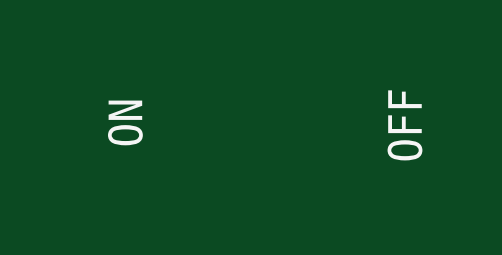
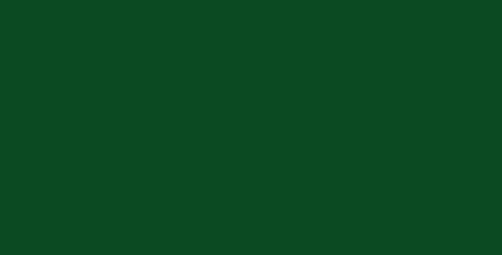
text: ON (125, 122) -> none
text: OFF (404, 125) -> none

